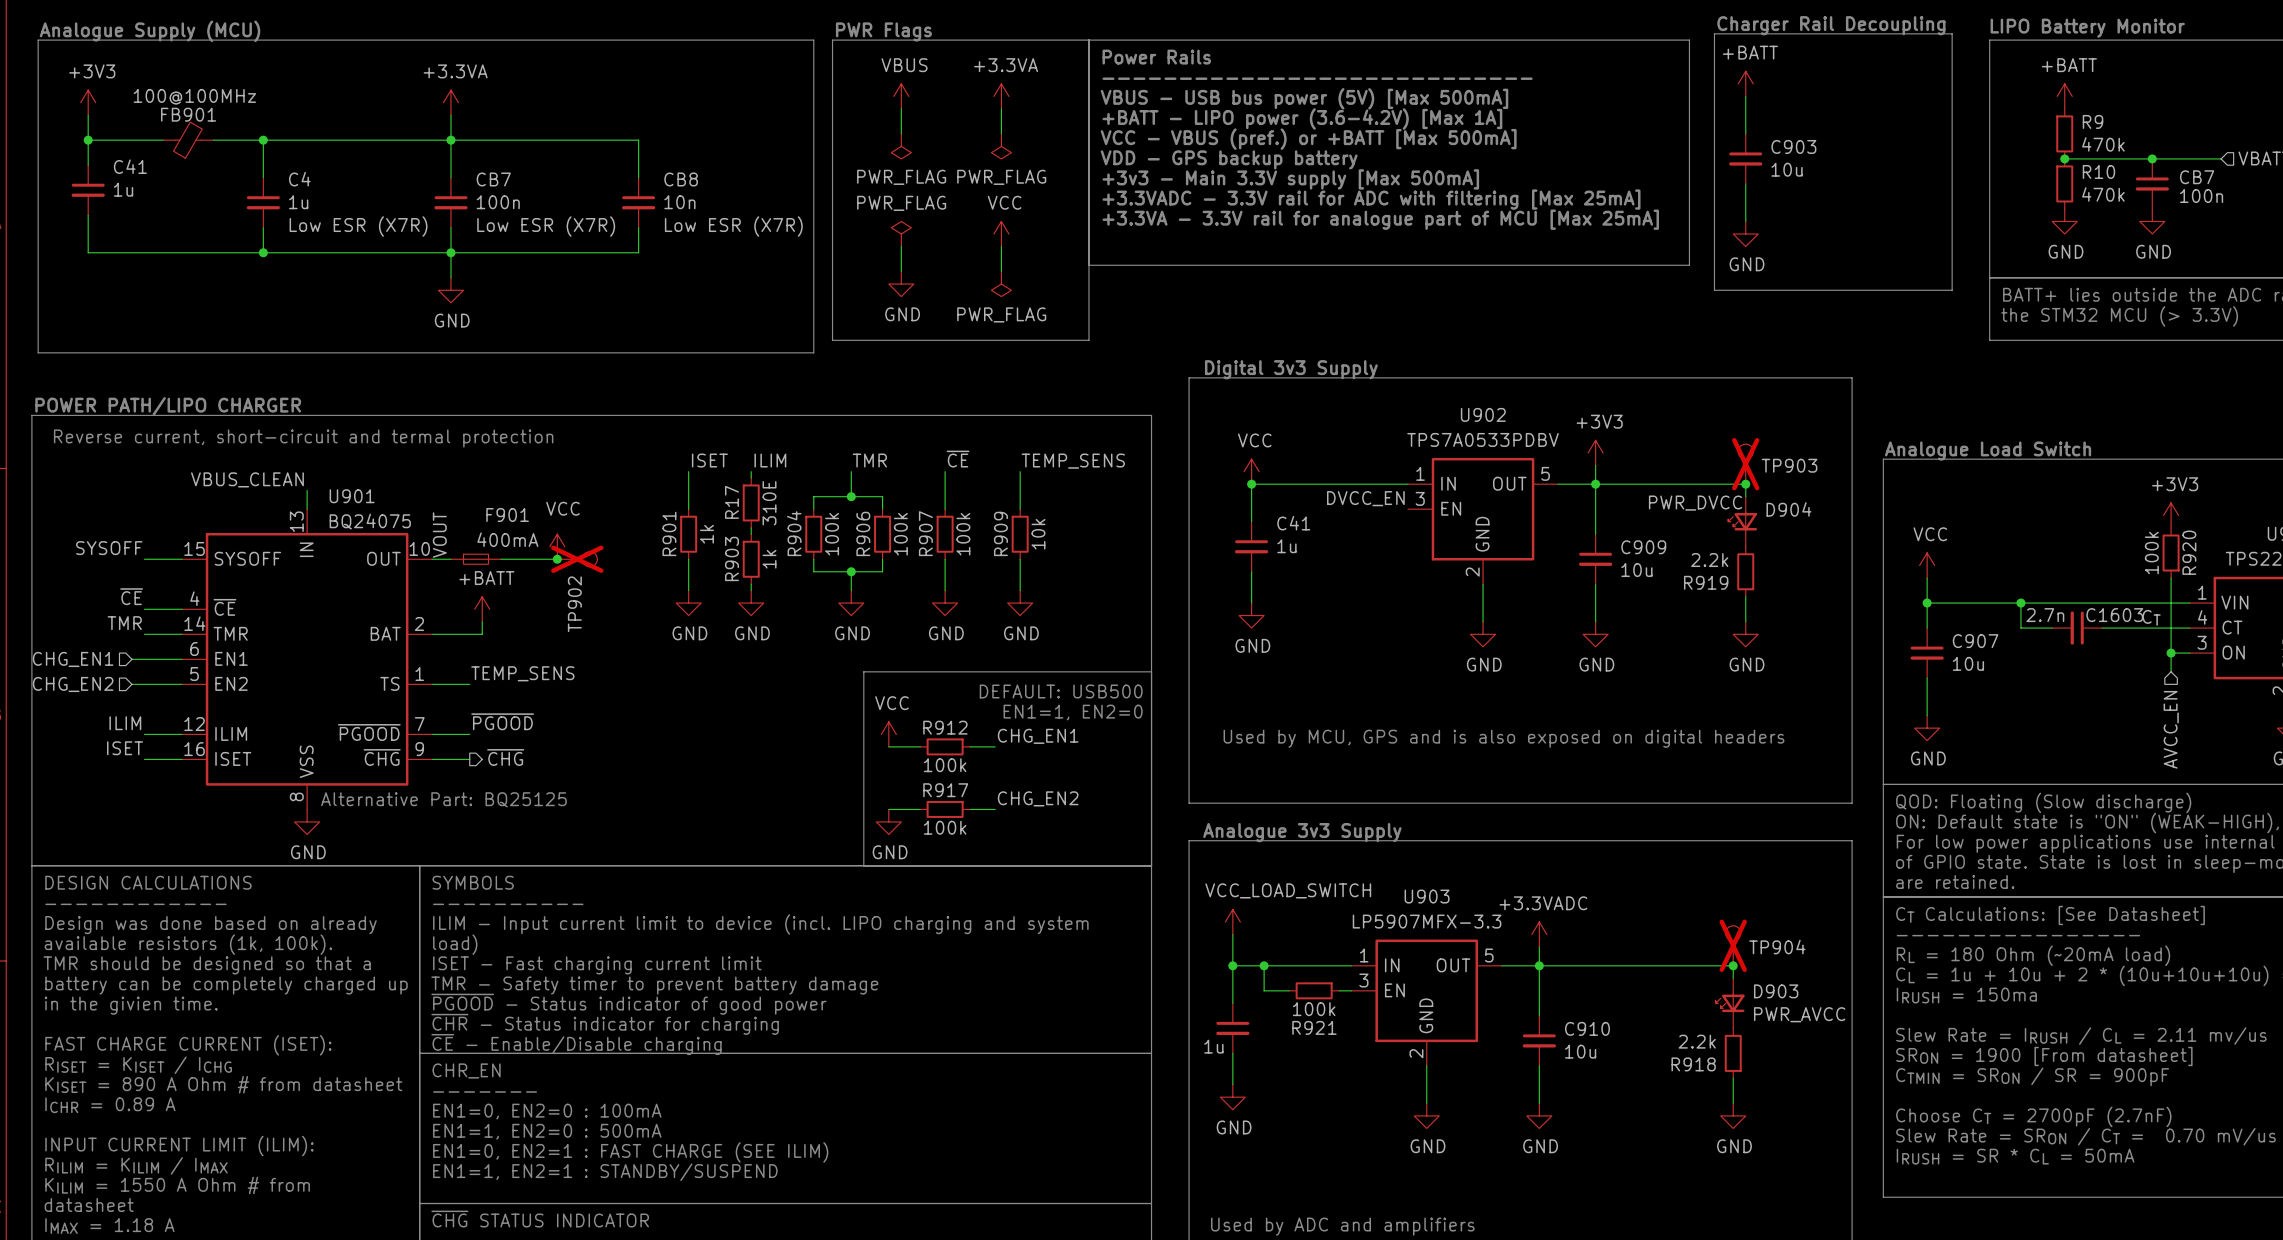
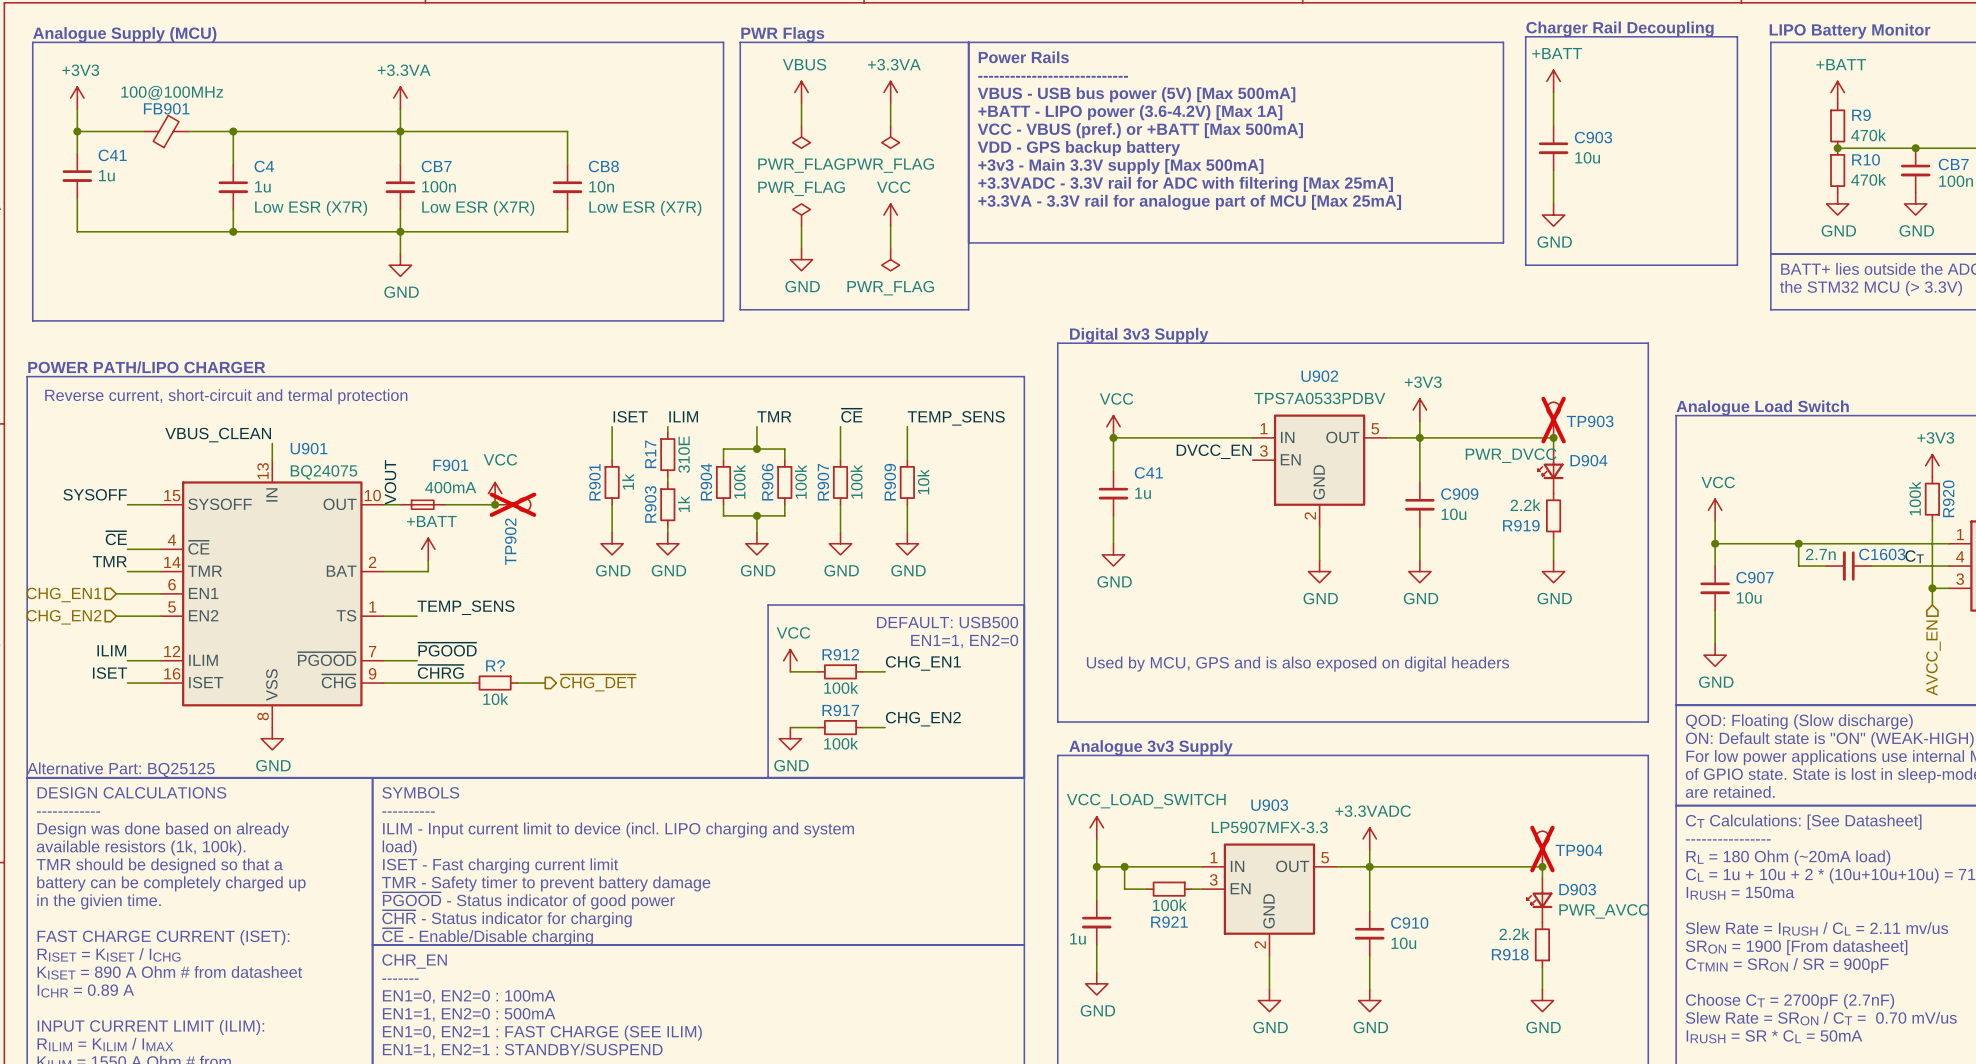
label: none -> ~{CHRG} (440, 671)
hierarchical label: ~{CHG} (505, 757) -> none
hierarchical label: none -> ~{CHG_DET} (598, 682)
wire: none -> (417, 683) (472, 683)
R?: none -> 10k (495, 683)
wire: none -> (517, 683) (545, 683)
text: Alternative Part: BQ25125 (443, 799) -> none
text: none -> Alternative Part: BQ25125 (120, 769)

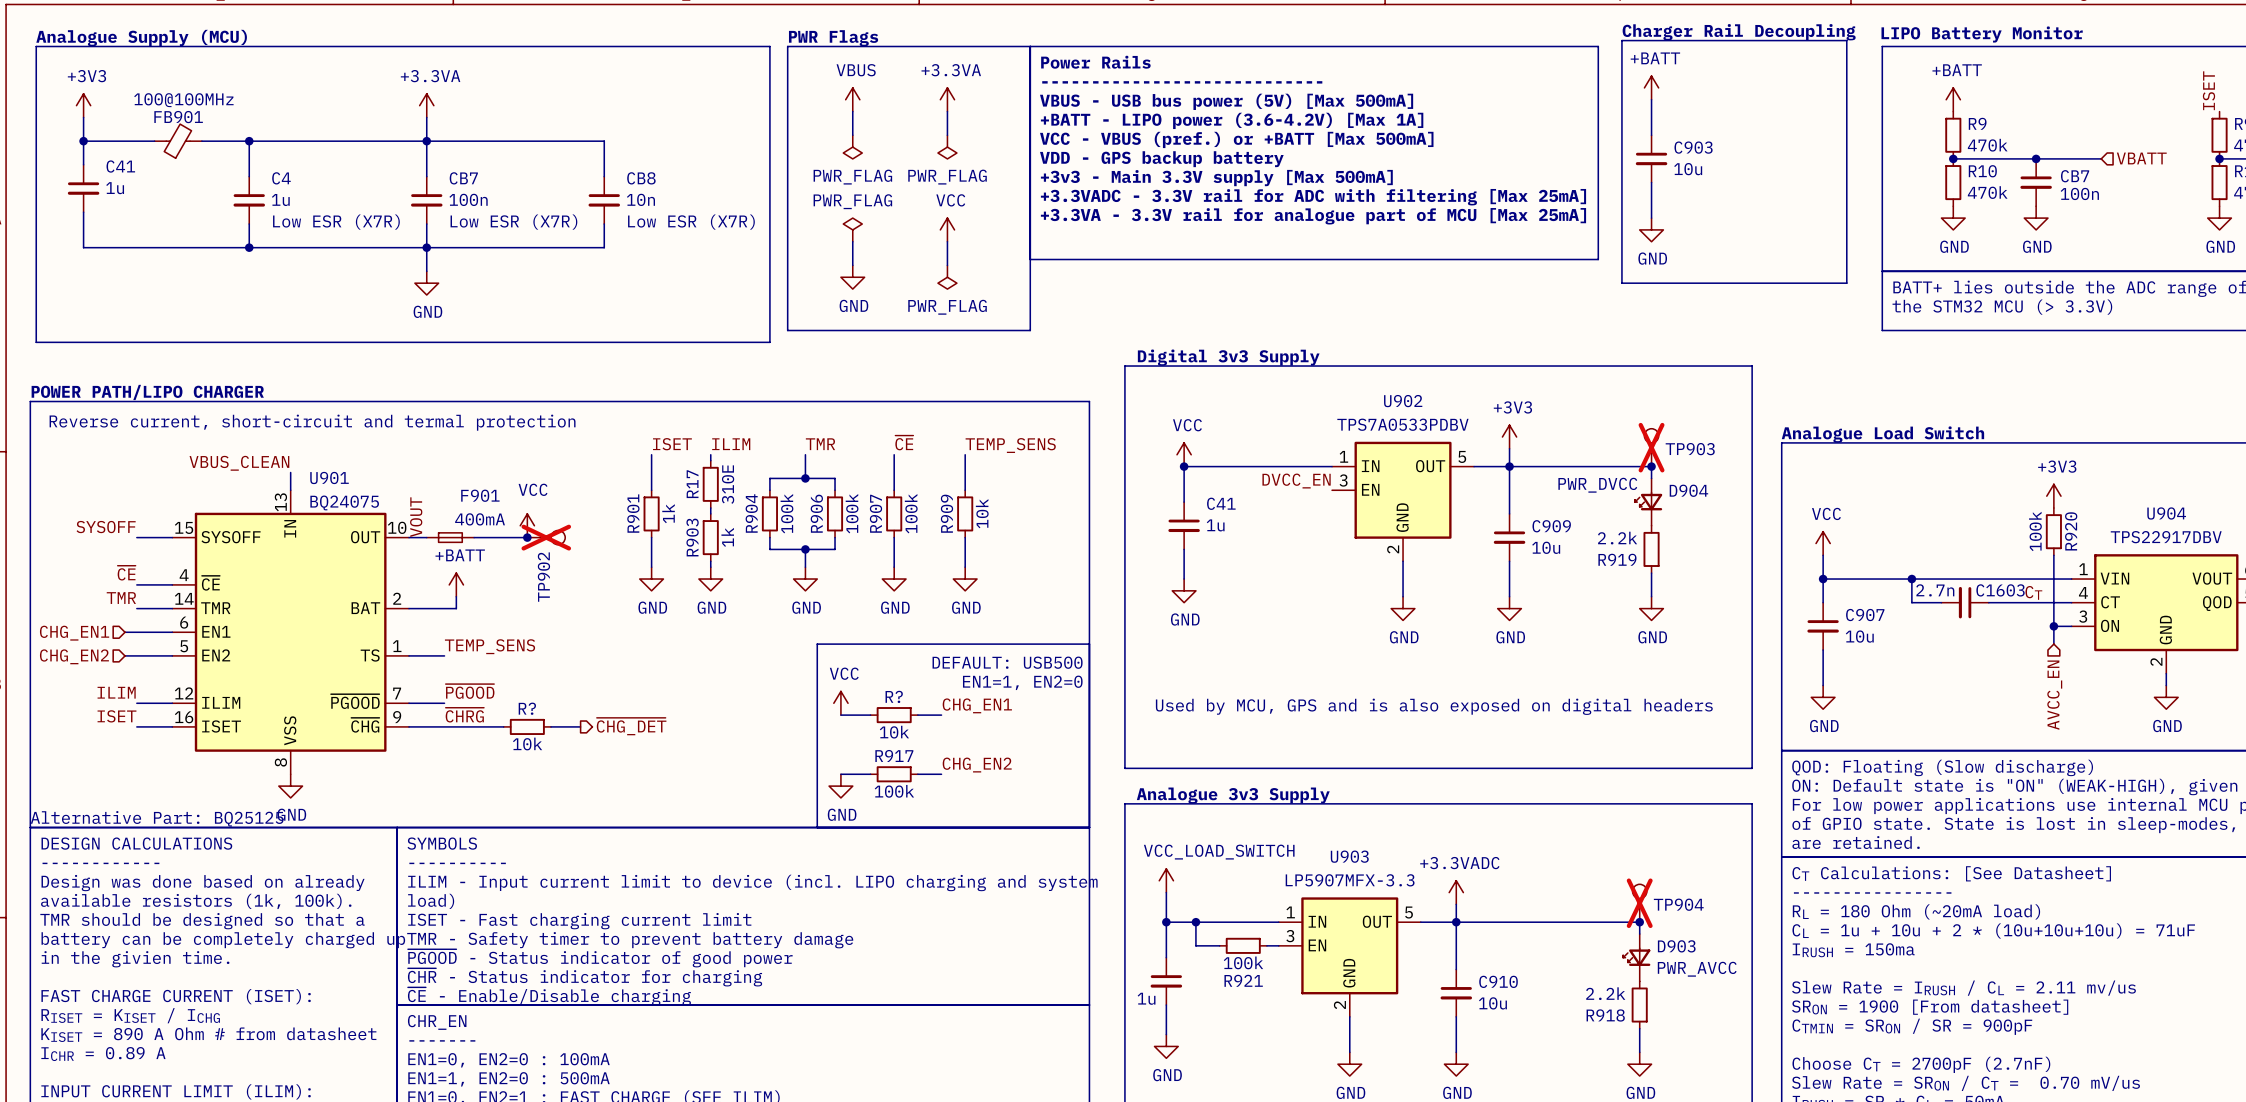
R912 name: R912 (840, 654) -> R? (894, 696)
R912 value: 100k (841, 687) -> 10k (894, 732)

